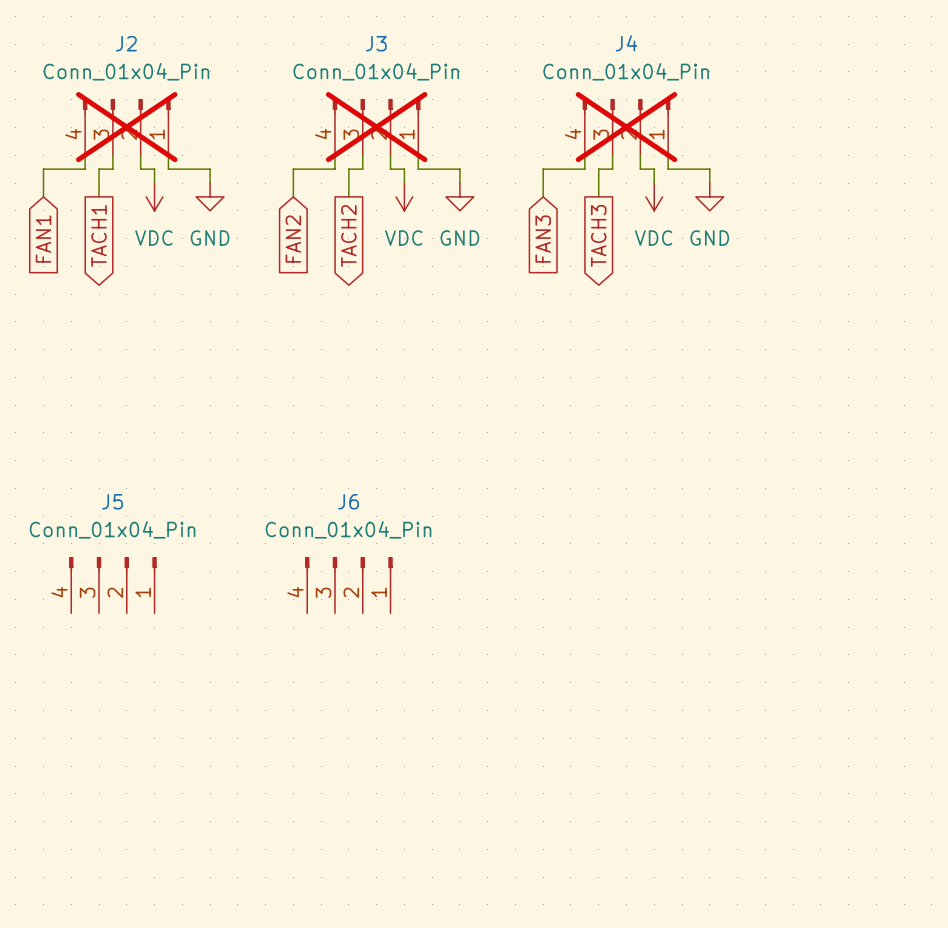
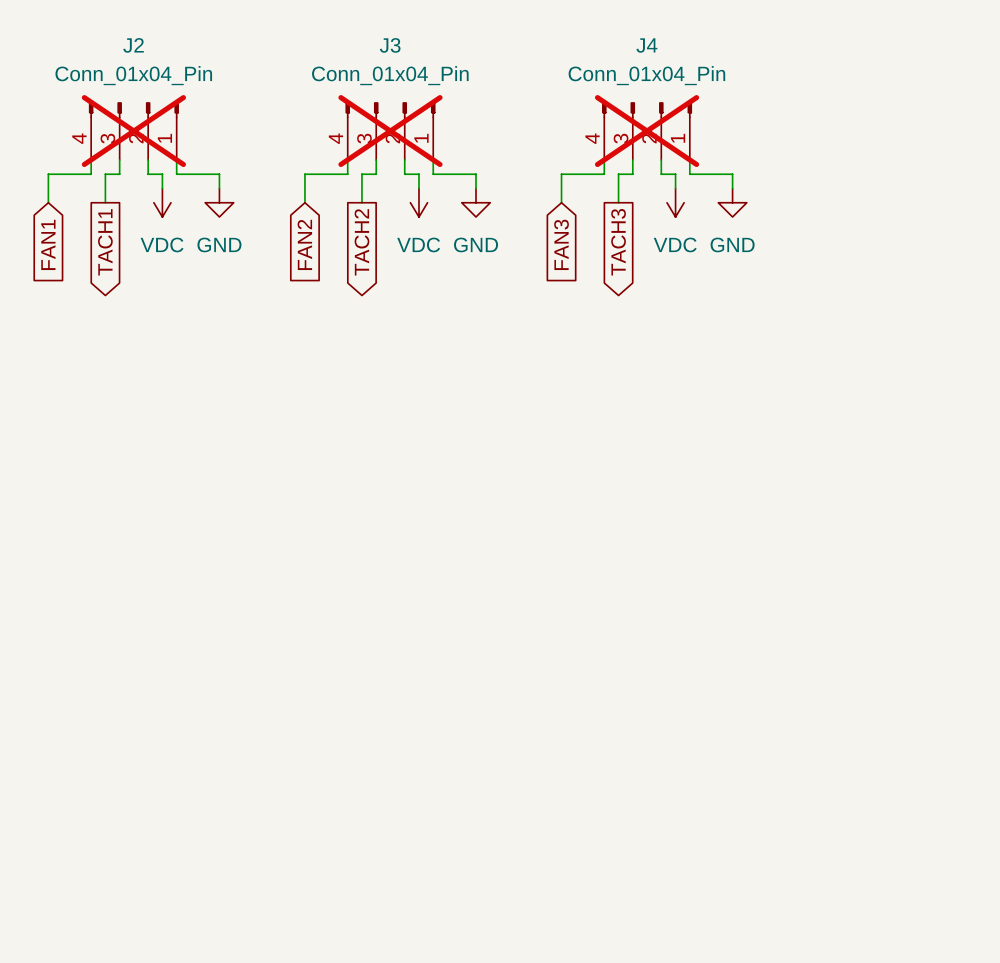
J5: Conn_01x04_Pin (112, 585) -> none
J6: Conn_01x04_Pin (348, 585) -> none

